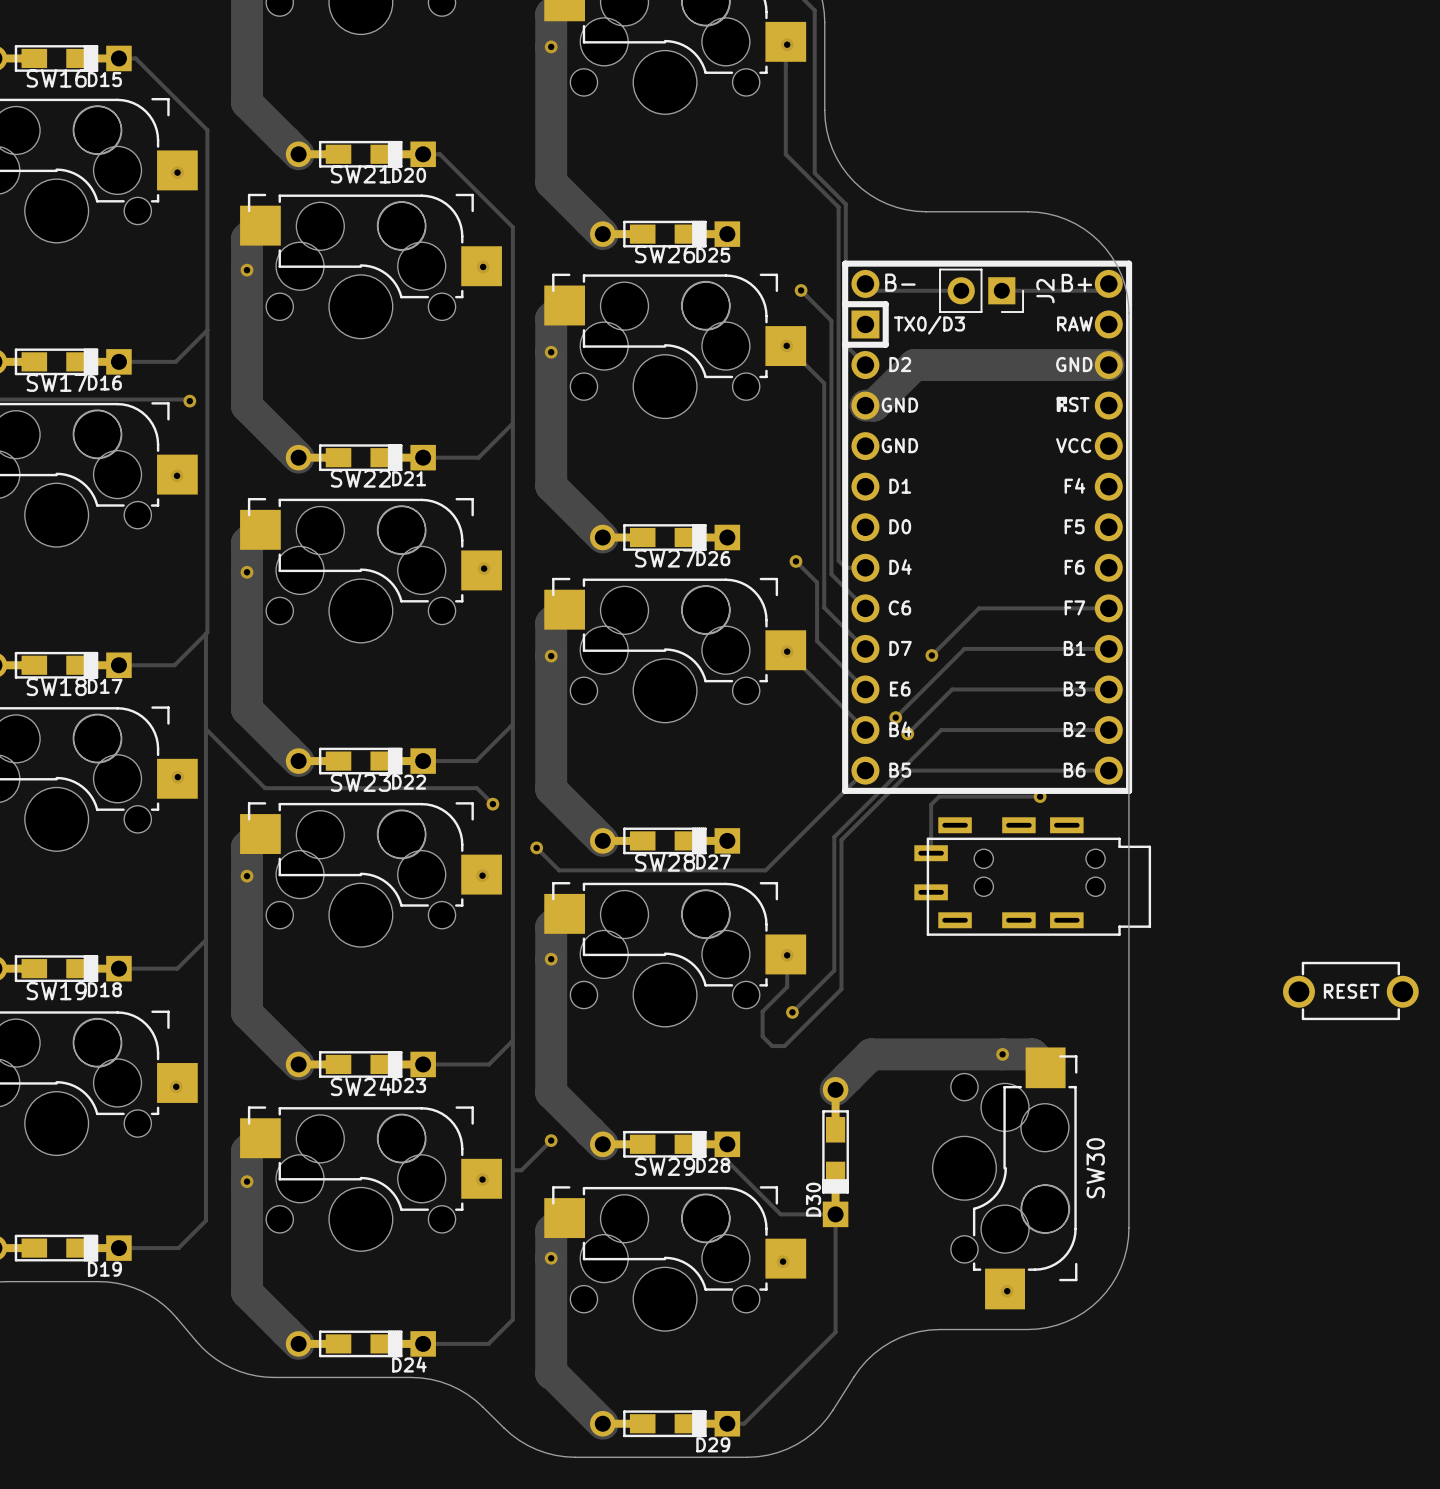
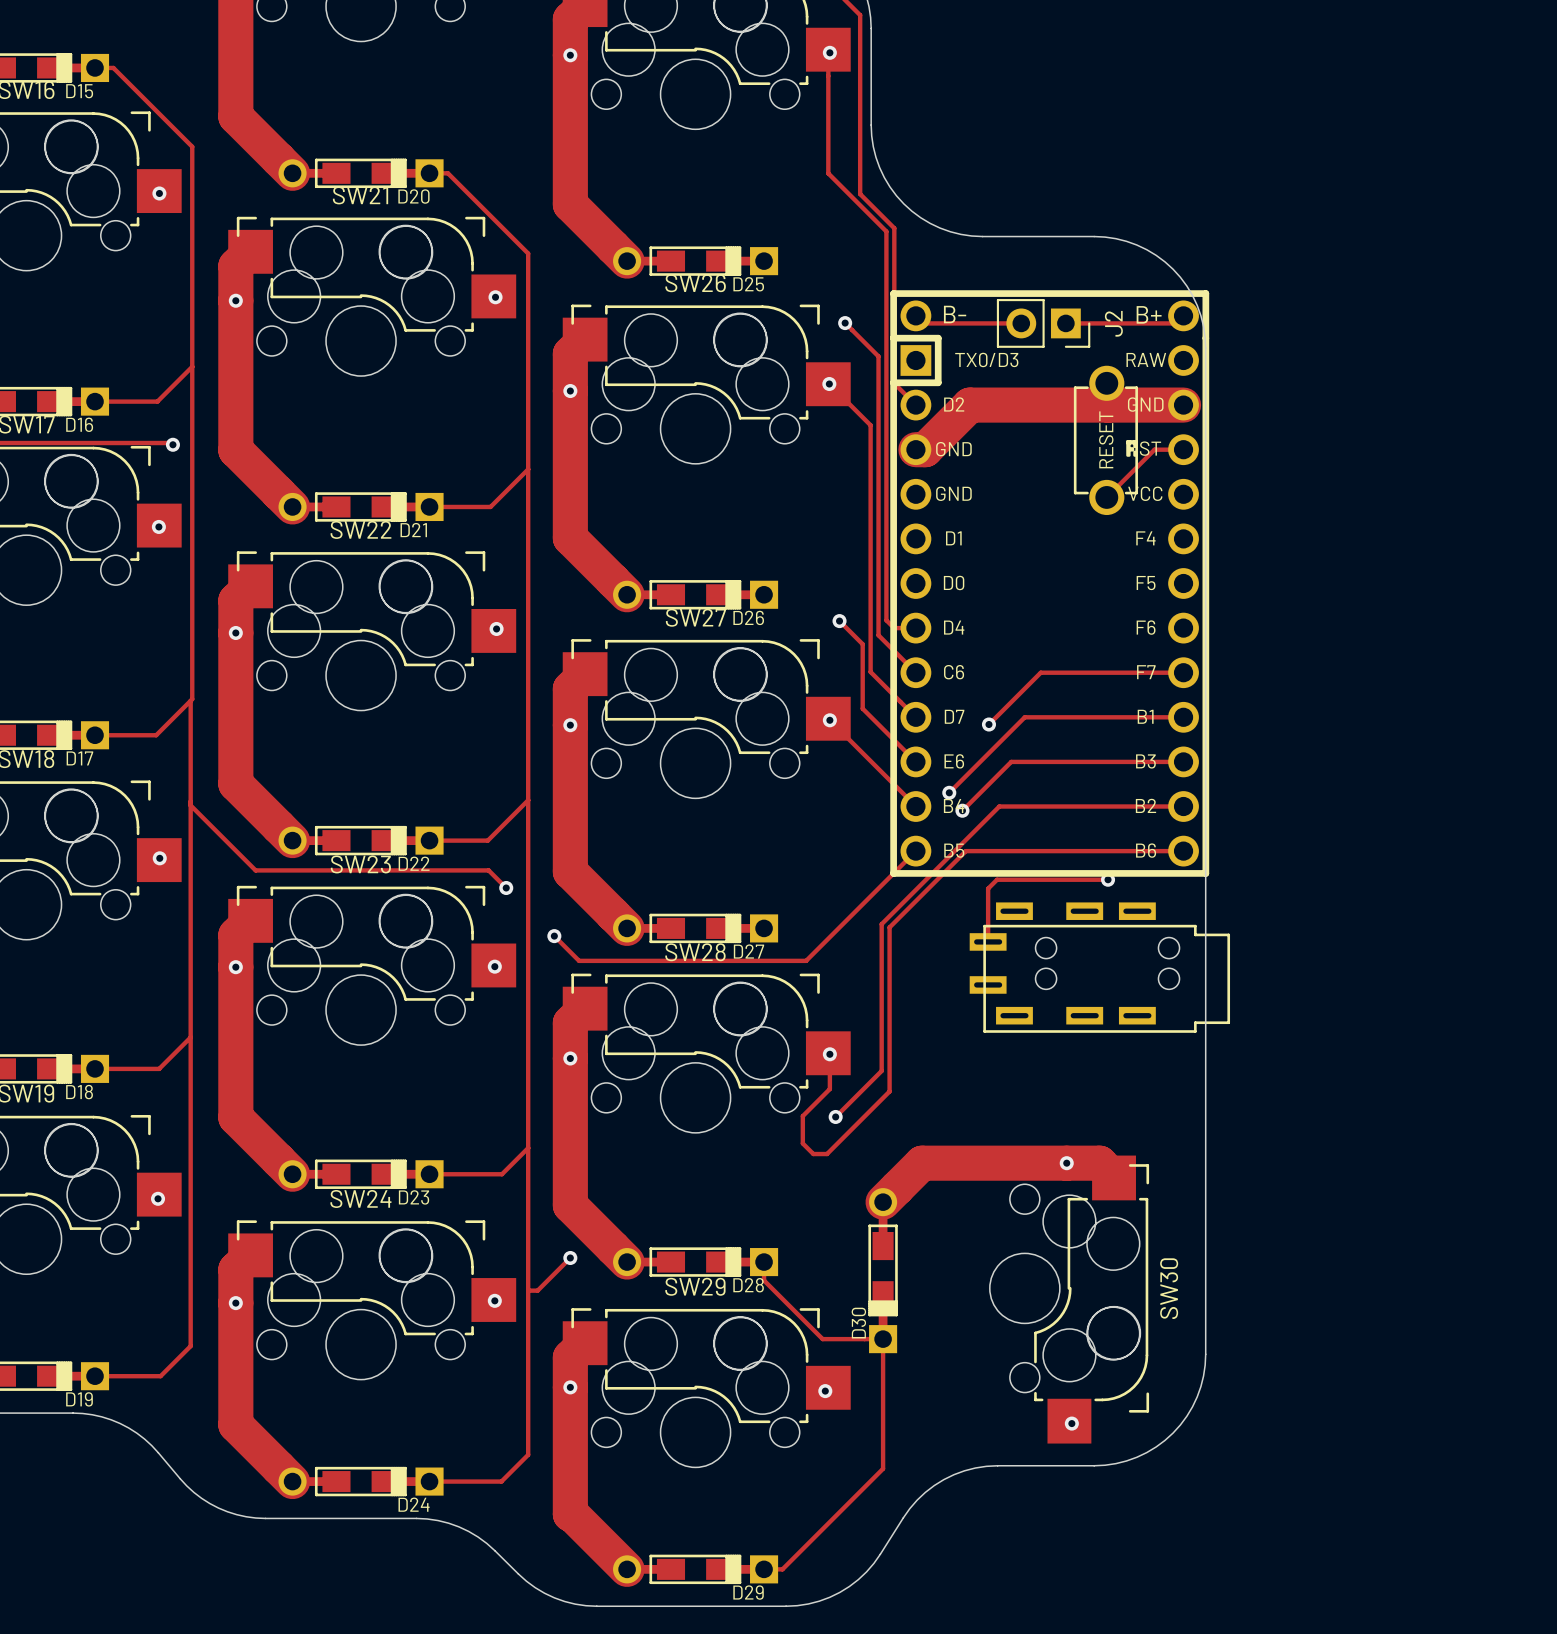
part: none -> (1105, 440)
track: none -> (1182, 449) (1154, 449) (1106, 497)
part: (1350, 990) -> none

